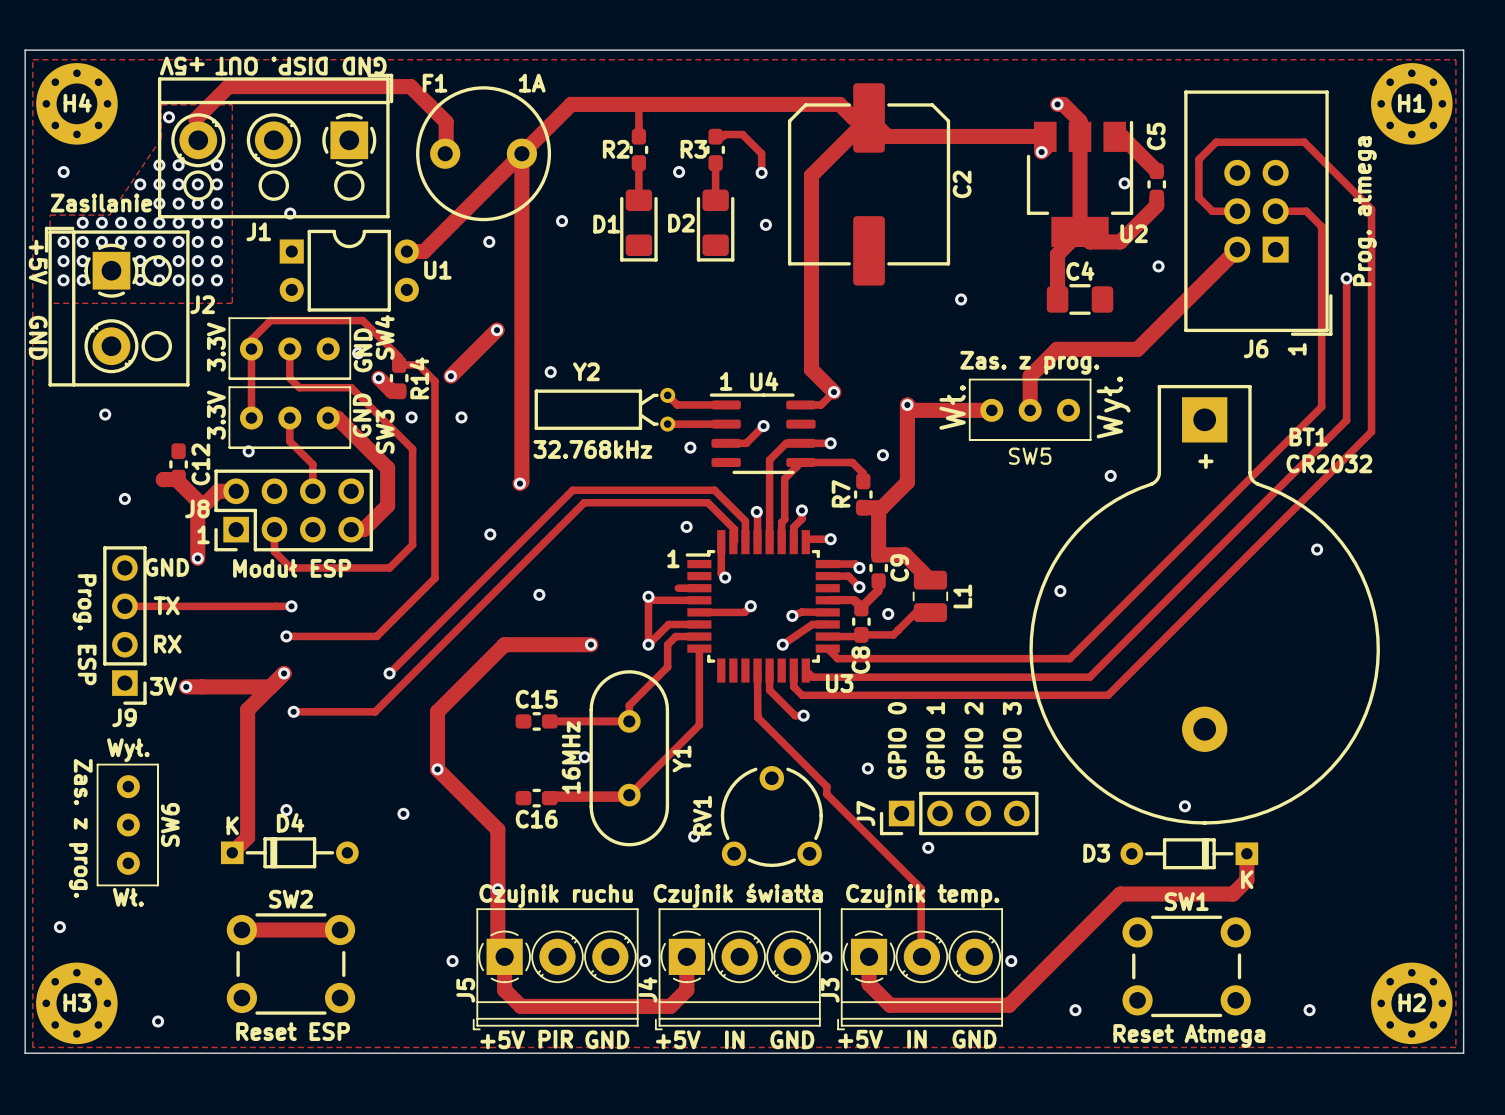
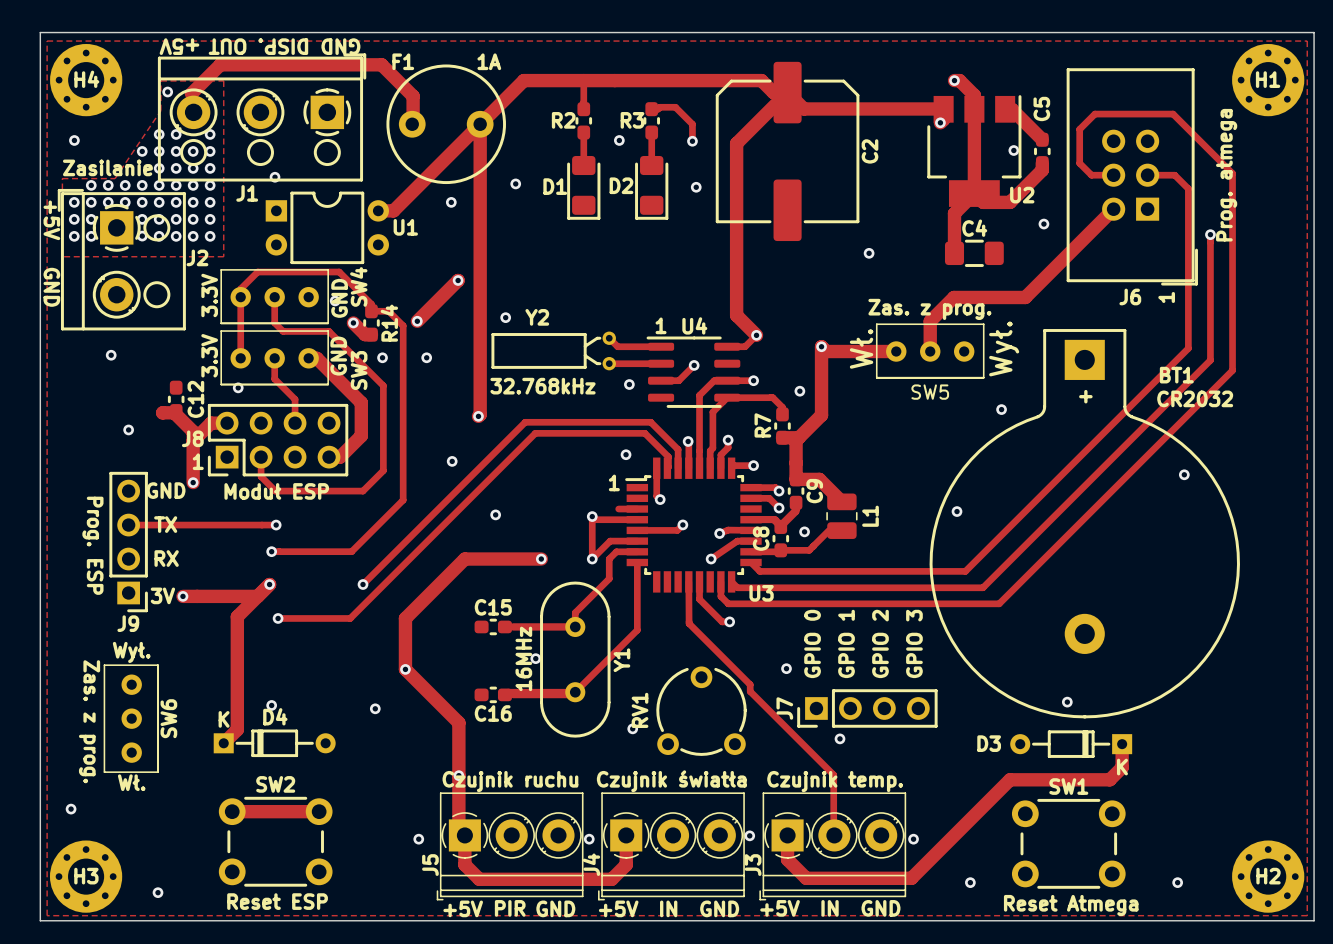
C8 name position: C8 (860, 660) -> C8 (761, 538)

